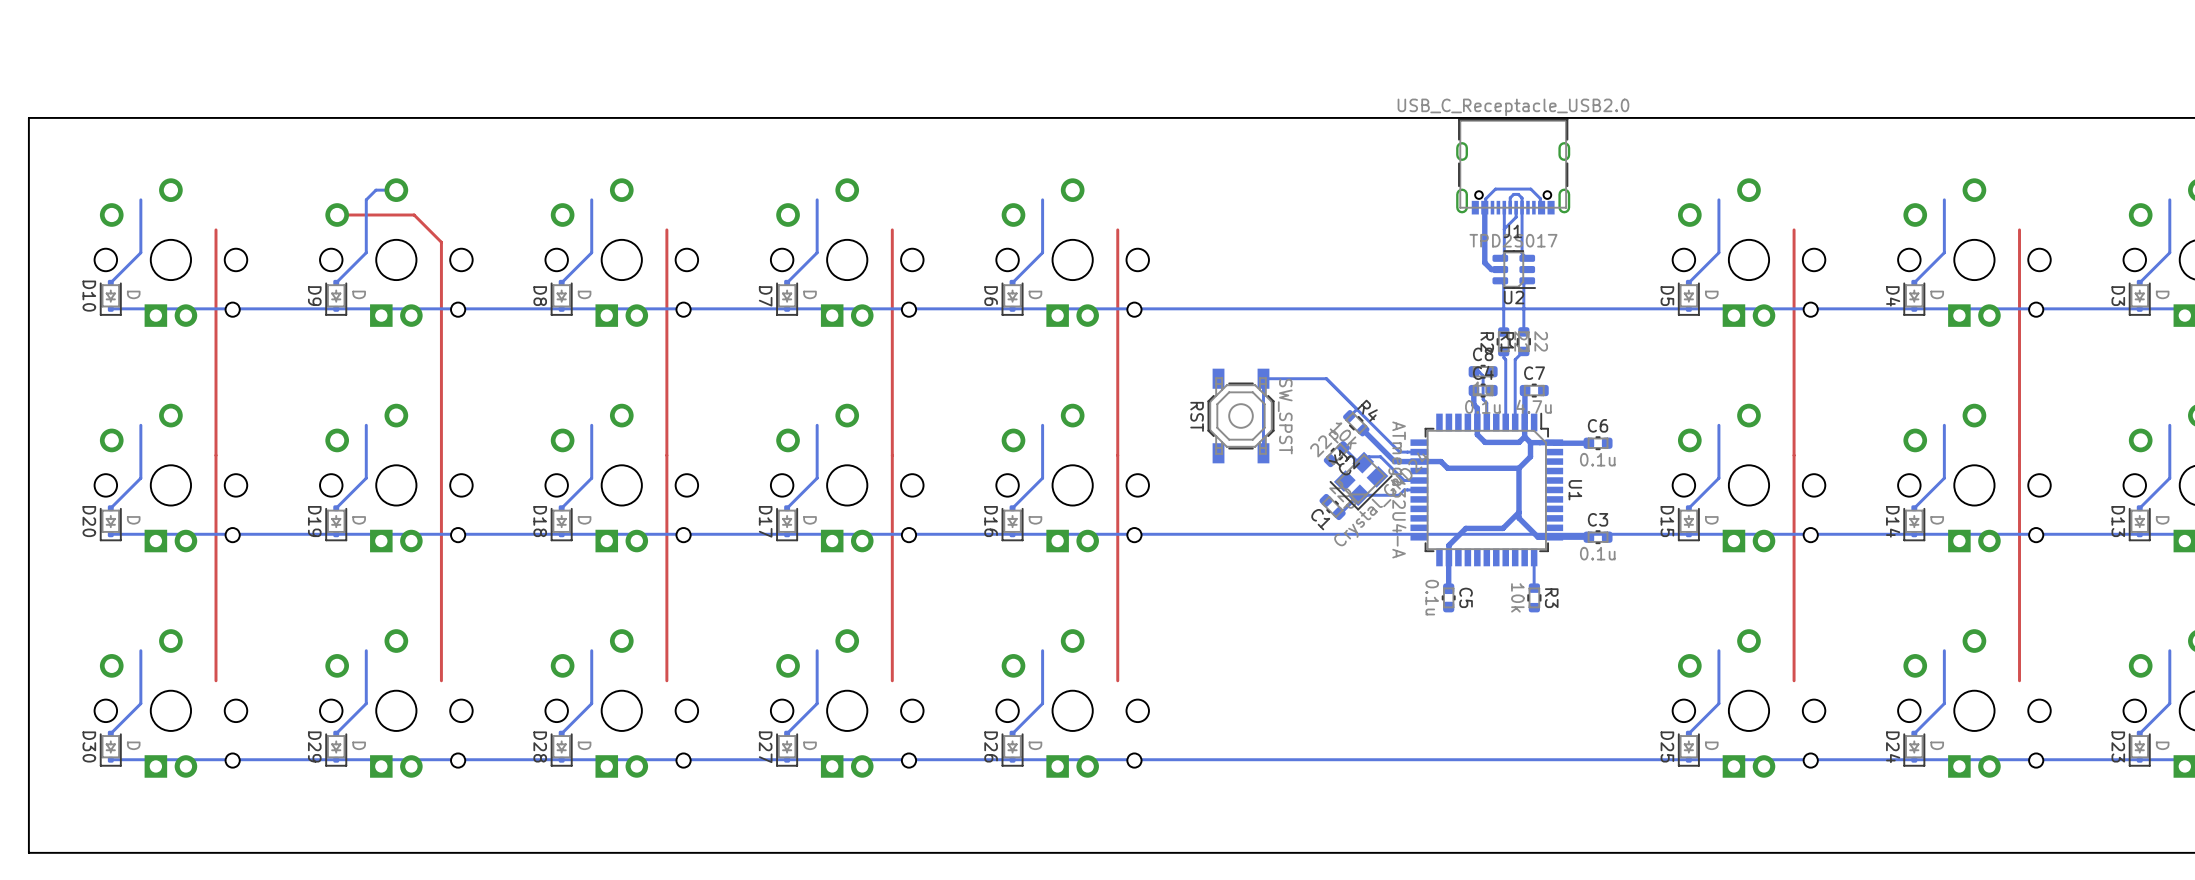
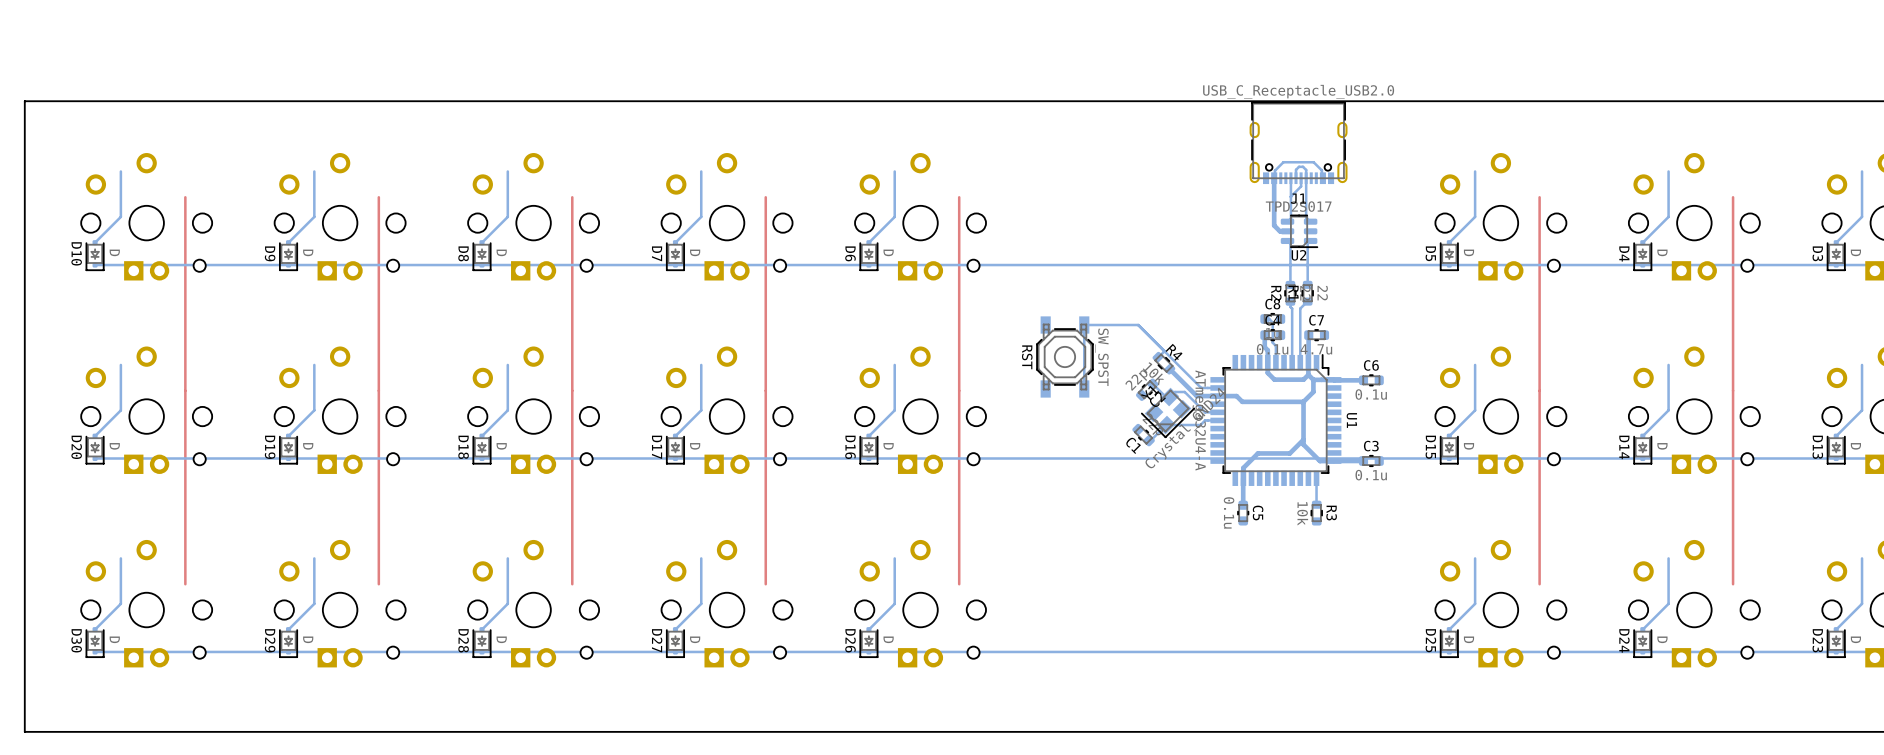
bottom track: (396, 190) (375, 190) (366, 199) -> none
top track: (337, 215) (414, 215) (441, 242) -> (378, 197) (378, 207)

